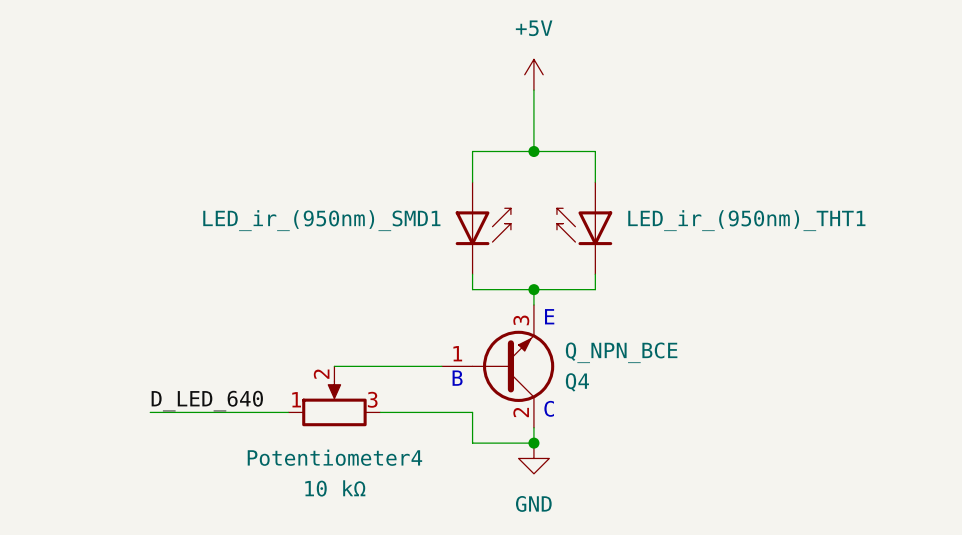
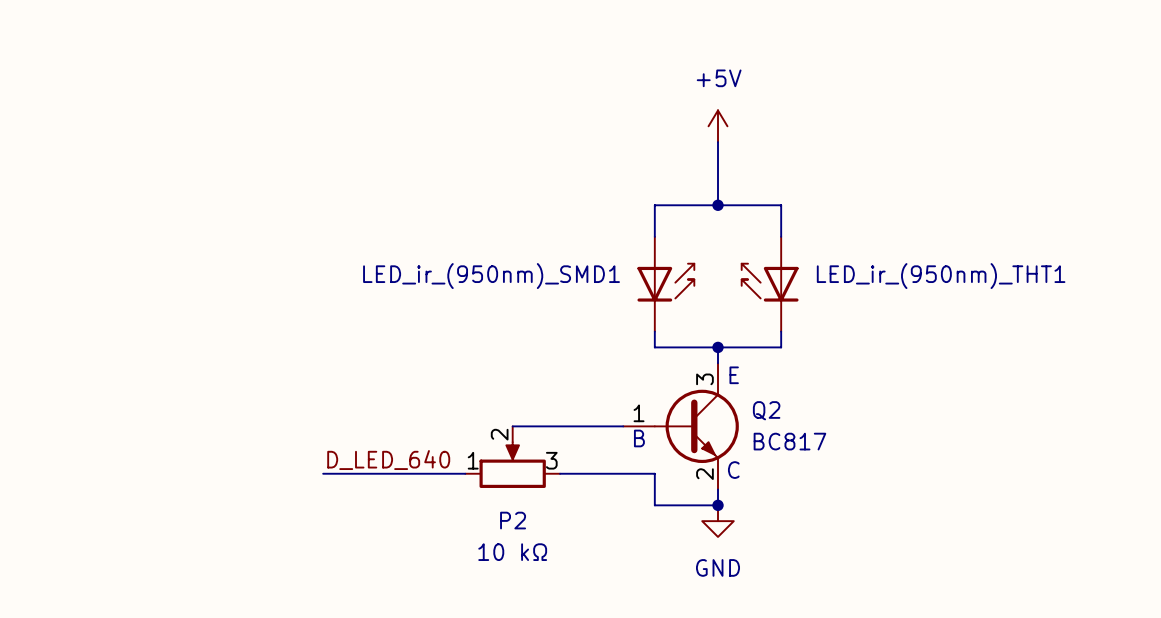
Q4: Q_NPN_BCE (498, 366) -> none
Q2: none -> BC817 (681, 426)
Potentiometer4 name: Potentiometer4 (334, 457) -> P2 (513, 520)

